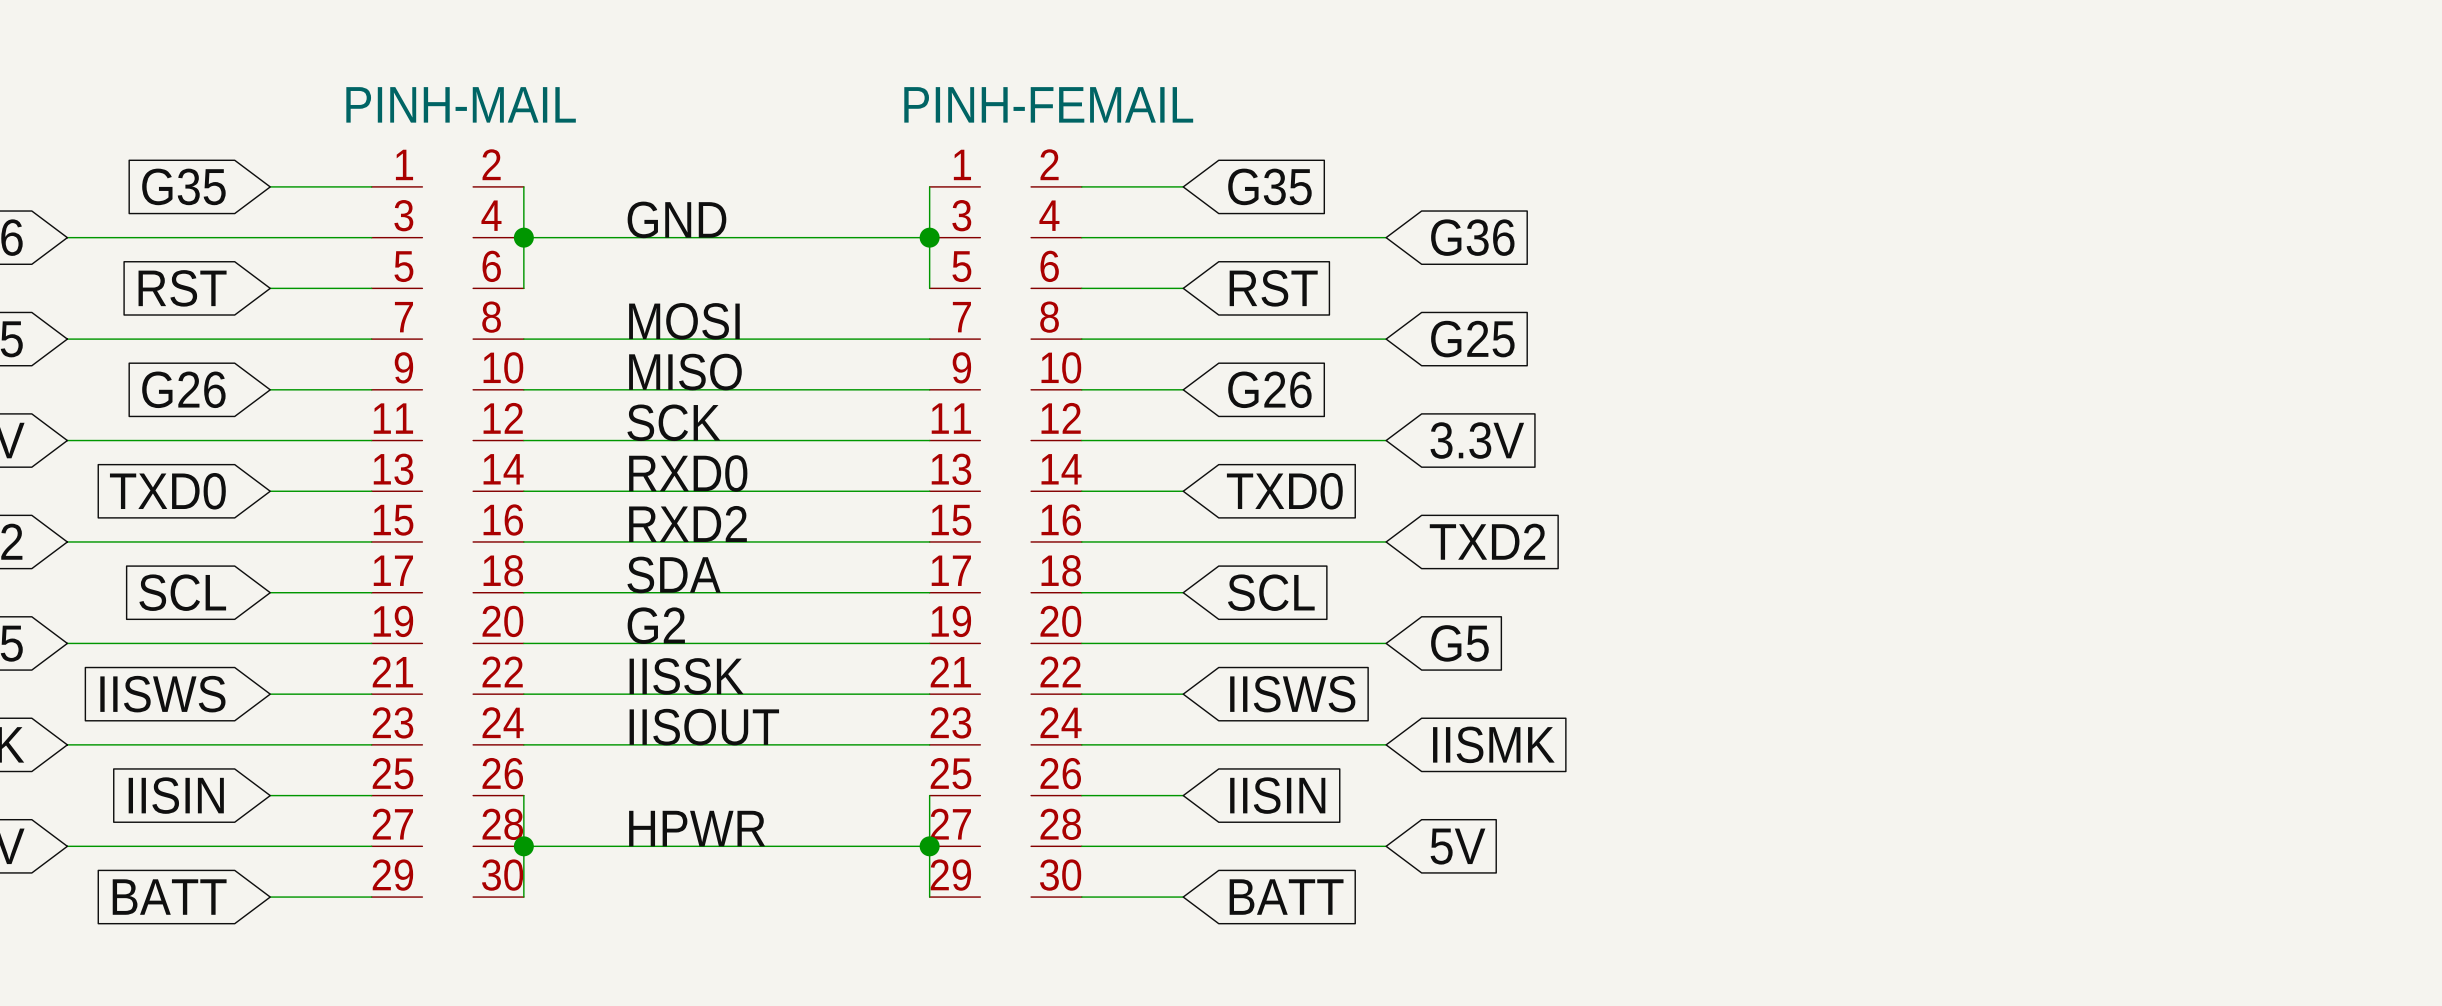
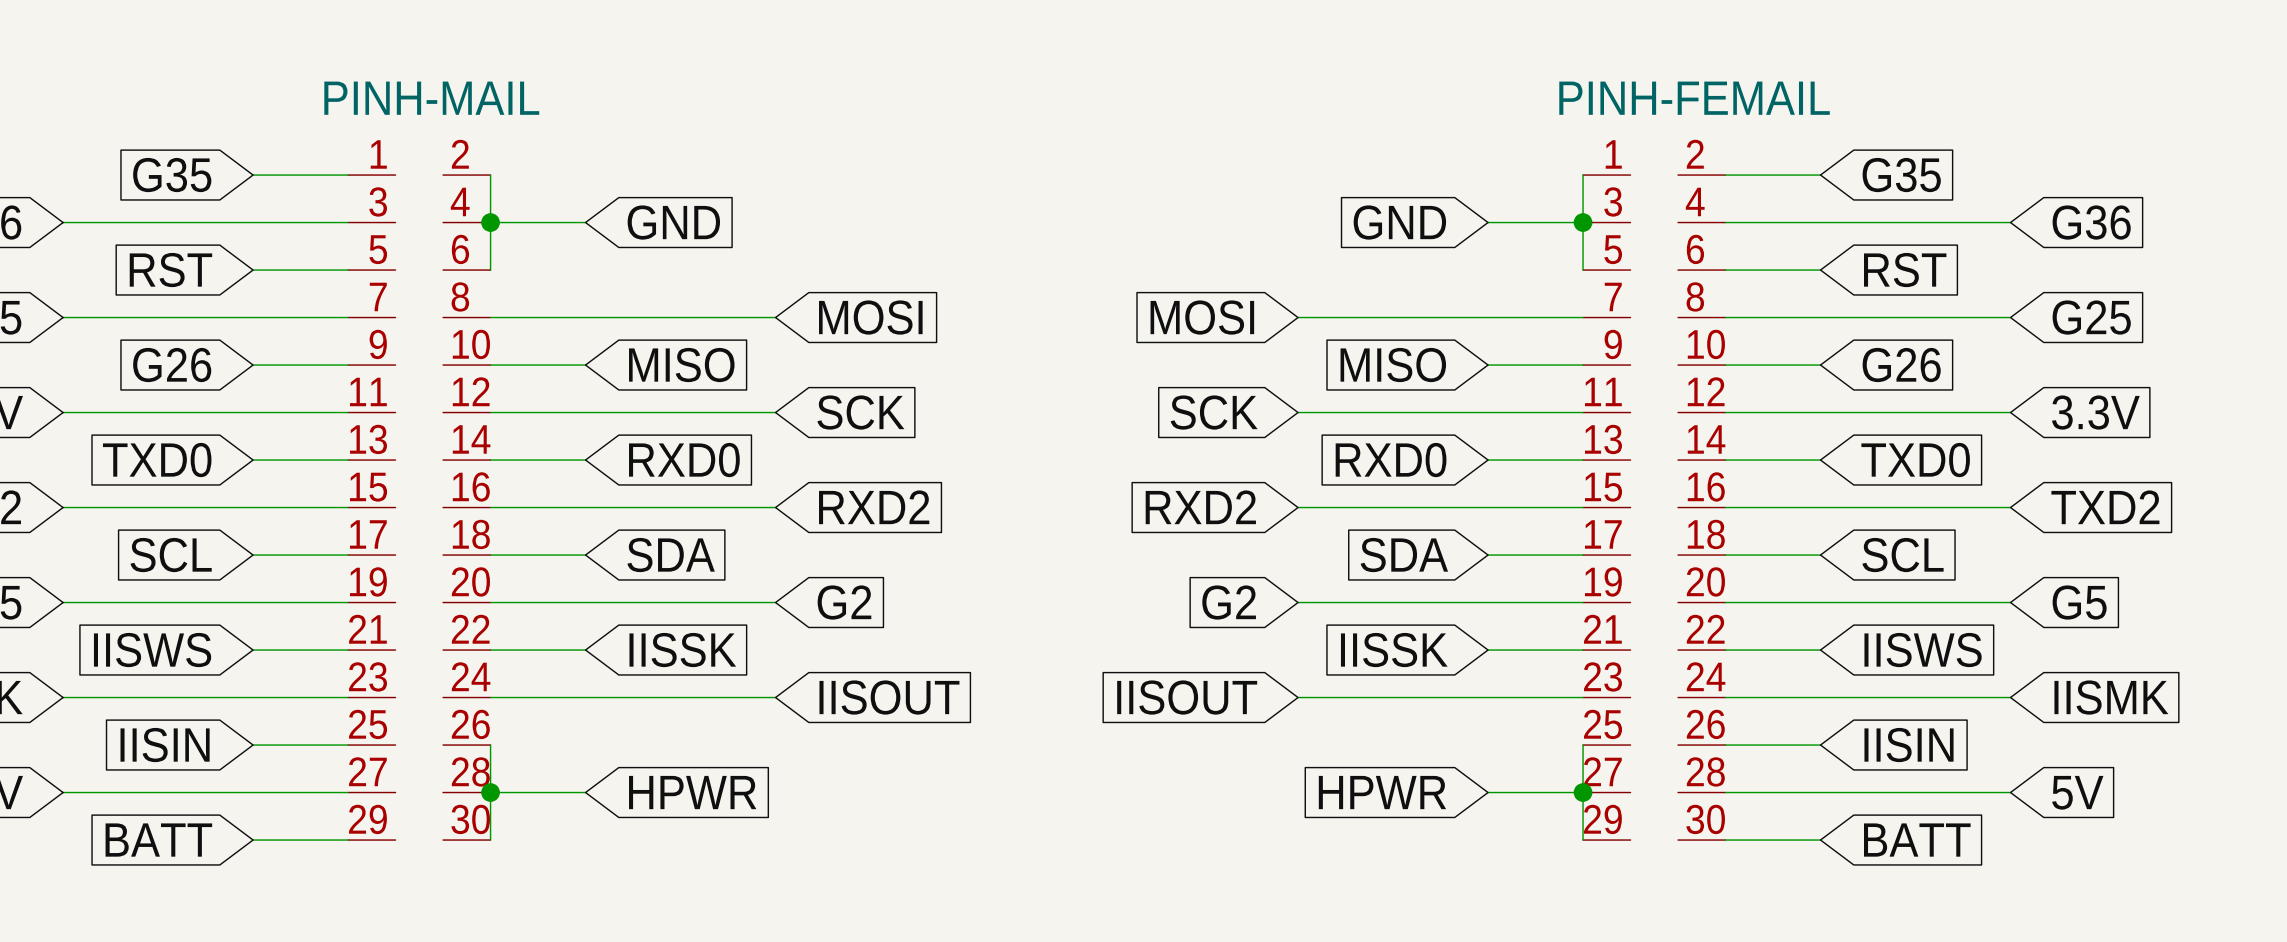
wire: (929, 186) (929, 288) -> none
wire: (1081, 186) (1183, 186) -> none
global label: G35 (1269, 186) -> none
wire: none -> (1583, 175) (1583, 270)
wire: none -> (1725, 175) (1820, 175)
global label: none -> G35 (1901, 175)
label: GND (676, 219) -> none
wire: (625, 237) (929, 237) -> none
global label: none -> GND (673, 222)
junction: (929, 237) -> none
wire: (1081, 237) (1386, 237) -> none
global label: G36 (1472, 237) -> none
global label: none -> GND (1399, 222)
wire: none -> (1488, 222) (1583, 222)
junction: none -> (1583, 222)
wire: none -> (1725, 222) (2010, 222)
global label: none -> G36 (2091, 222)
wire: (1081, 288) (1183, 288) -> none
global label: RST (1273, 288) -> none
wire: none -> (1725, 270) (1820, 270)
global label: none -> RST (1905, 270)
label: MOSI (684, 321) -> none
wire: (828, 339) (929, 339) -> none
global label: none -> MOSI (870, 317)
wire: (1081, 339) (1386, 339) -> (1583, 317) (1298, 317)
global label: G25 (1472, 339) -> MOSI (1202, 317)
wire: none -> (1725, 317) (2010, 317)
global label: none -> G25 (2091, 317)
label: MISO (685, 372) -> none
wire: (625, 389) (929, 389) -> none
global label: none -> MISO (681, 365)
wire: (1081, 389) (1183, 389) -> none
global label: G26 (1269, 389) -> none
global label: none -> MISO (1393, 365)
wire: none -> (1488, 365) (1583, 365)
wire: none -> (1725, 365) (1820, 365)
global label: none -> G26 (1901, 365)
label: SCK (673, 422) -> none
wire: (828, 440) (929, 440) -> none
global label: none -> SCK (860, 412)
wire: (1081, 440) (1386, 440) -> (1583, 412) (1298, 412)
global label: 3.3V (1477, 440) -> SCK (1214, 412)
wire: none -> (1725, 412) (2010, 412)
global label: none -> 3.3V (2095, 412)
label: RXD0 (688, 473) -> none
wire: (625, 491) (929, 491) -> none
global label: none -> RXD0 (684, 460)
wire: (1081, 491) (1183, 491) -> none
global label: TXD0 (1284, 491) -> RXD0 (1391, 460)
wire: none -> (1488, 460) (1583, 460)
wire: none -> (1725, 460) (1820, 460)
global label: none -> TXD0 (1915, 460)
label: RXD2 (687, 523) -> none
wire: (828, 541) (929, 541) -> none
global label: none -> RXD2 (874, 507)
PINH-FEMAIL: (1005, 541) -> none
wire: (1081, 541) (1386, 541) -> (1583, 507) (1298, 507)
global label: TXD2 (1487, 541) -> RXD2 (1200, 507)
PINH-FEMAIL: none -> (1654, 507)
wire: none -> (1725, 507) (2010, 507)
global label: none -> TXD2 (2105, 507)
label: SDA (674, 574) -> none
wire: (625, 592) (929, 592) -> none
global label: none -> SDA (671, 555)
wire: (1081, 592) (1183, 592) -> none
global label: SCL (1271, 592) -> none
global label: none -> SDA (1404, 555)
wire: none -> (1488, 555) (1583, 555)
wire: none -> (1725, 555) (1820, 555)
global label: none -> SCL (1903, 555)
label: G2 (656, 625) -> none
wire: (828, 643) (929, 643) -> none
global label: none -> G2 (844, 602)
wire: (1081, 643) (1386, 643) -> (1583, 602) (1298, 602)
global label: G5 (1459, 643) -> G2 (1229, 602)
wire: none -> (1725, 602) (2010, 602)
global label: none -> G5 (2079, 602)
label: IISSK (686, 676) -> none
wire: (625, 694) (929, 694) -> none
global label: none -> IISSK (682, 650)
wire: (1081, 694) (1183, 694) -> none
global label: IISWS (1292, 694) -> IISSK (1394, 650)
wire: none -> (1488, 650) (1583, 650)
wire: none -> (1725, 650) (1820, 650)
global label: none -> IISWS (1923, 650)
label: IISOUT (704, 727) -> none
wire: (828, 744) (929, 744) -> none
global label: none -> IISOUT (889, 697)
wire: (1081, 744) (1386, 744) -> (1583, 697) (1298, 697)
global label: IISMK (1493, 744) -> IISOUT (1187, 697)
wire: none -> (1725, 697) (2010, 697)
global label: none -> IISMK (2111, 697)
wire: (929, 795) (929, 897) -> none
wire: (1081, 795) (1183, 795) -> none
global label: IISIN (1277, 795) -> none
wire: none -> (1583, 745) (1583, 840)
wire: none -> (1725, 745) (1820, 745)
global label: none -> IISIN (1909, 745)
label: HPWR (697, 828) -> none
wire: (625, 846) (929, 846) -> none
global label: none -> HPWR (692, 792)
junction: (929, 846) -> none
wire: (1081, 846) (1386, 846) -> none
global label: 5V (1457, 846) -> none
global label: none -> HPWR (1382, 792)
wire: none -> (1488, 792) (1583, 792)
junction: none -> (1583, 792)
wire: none -> (1725, 792) (2010, 792)
global label: none -> 5V (2077, 792)
wire: (1081, 897) (1183, 897) -> none
global label: BATT (1286, 897) -> none
wire: none -> (1725, 840) (1820, 840)
global label: none -> BATT (1917, 840)

